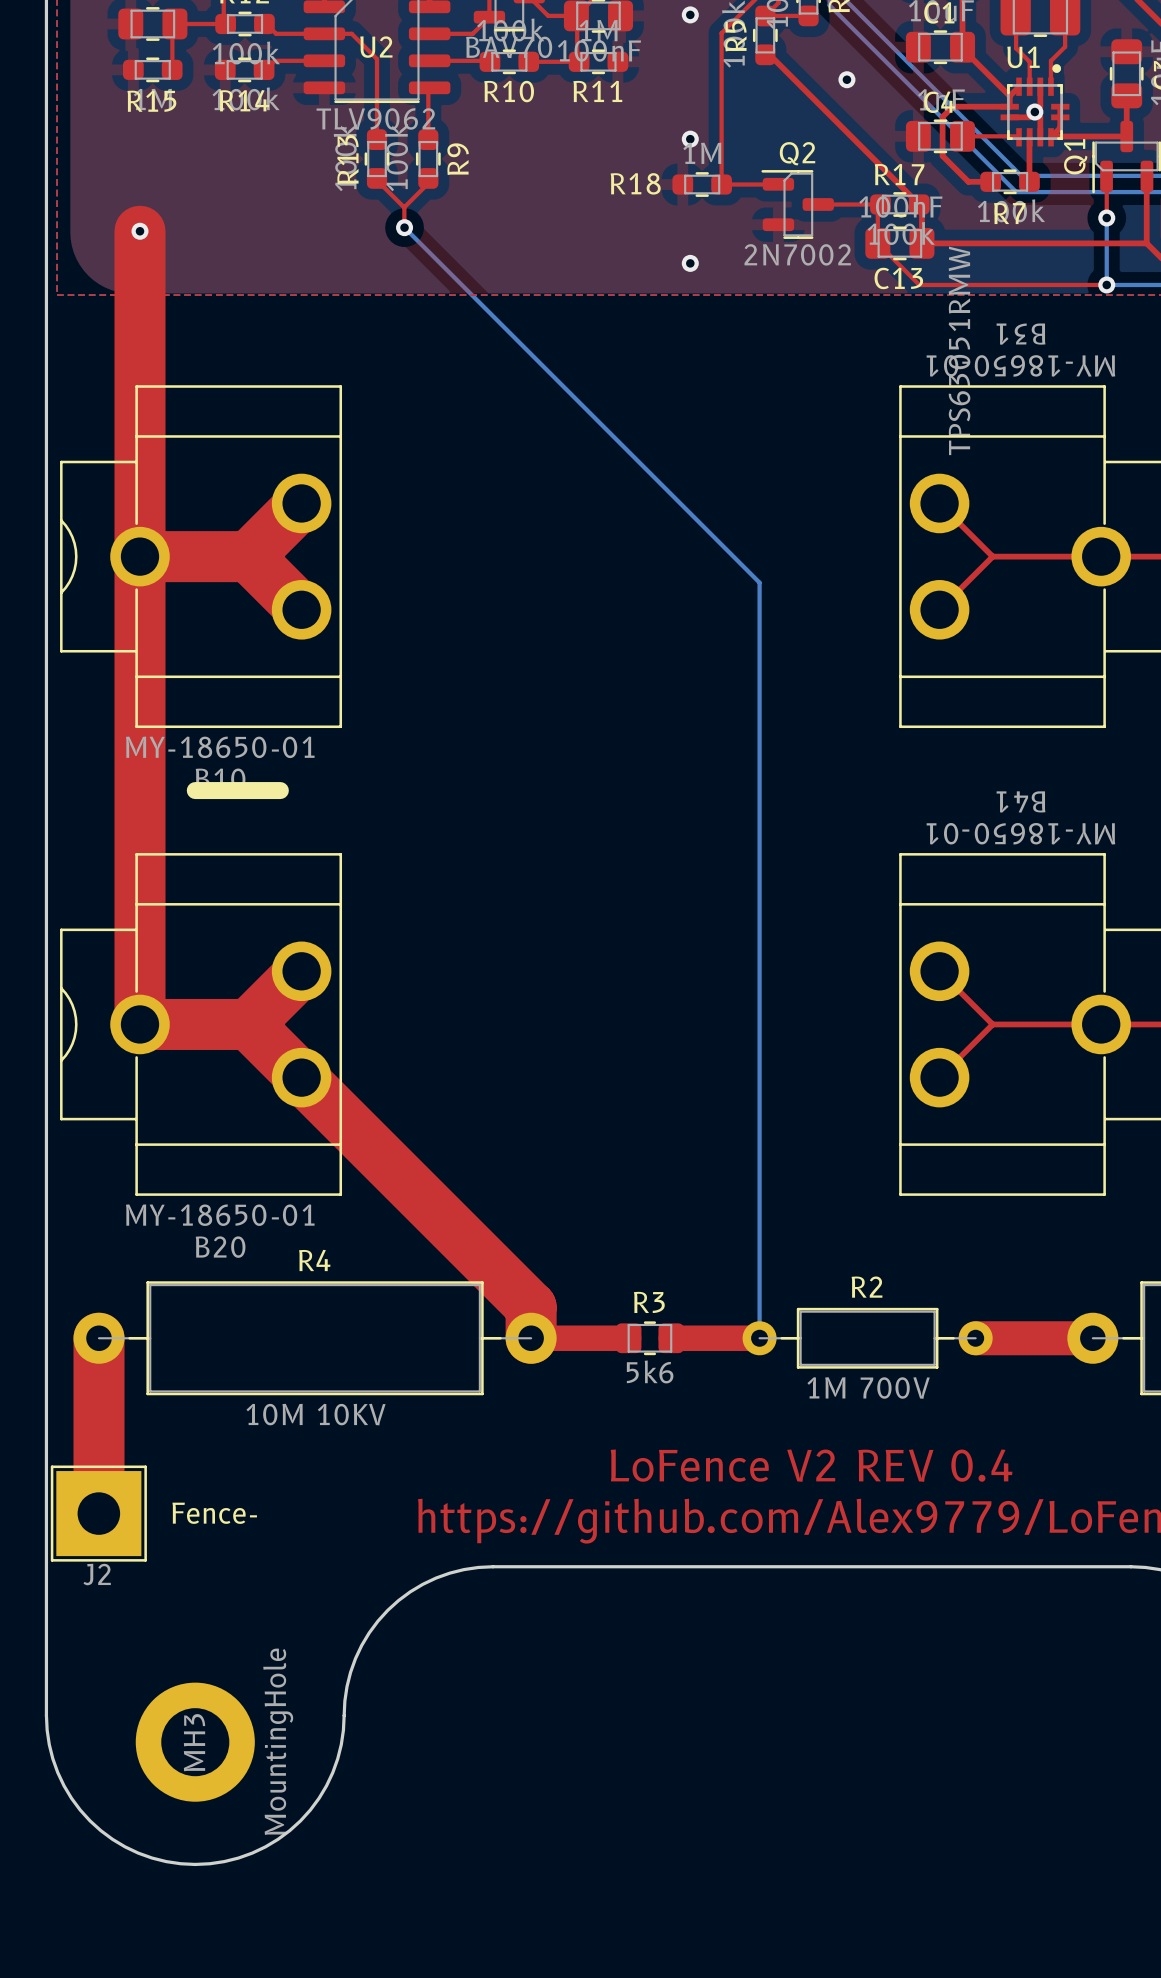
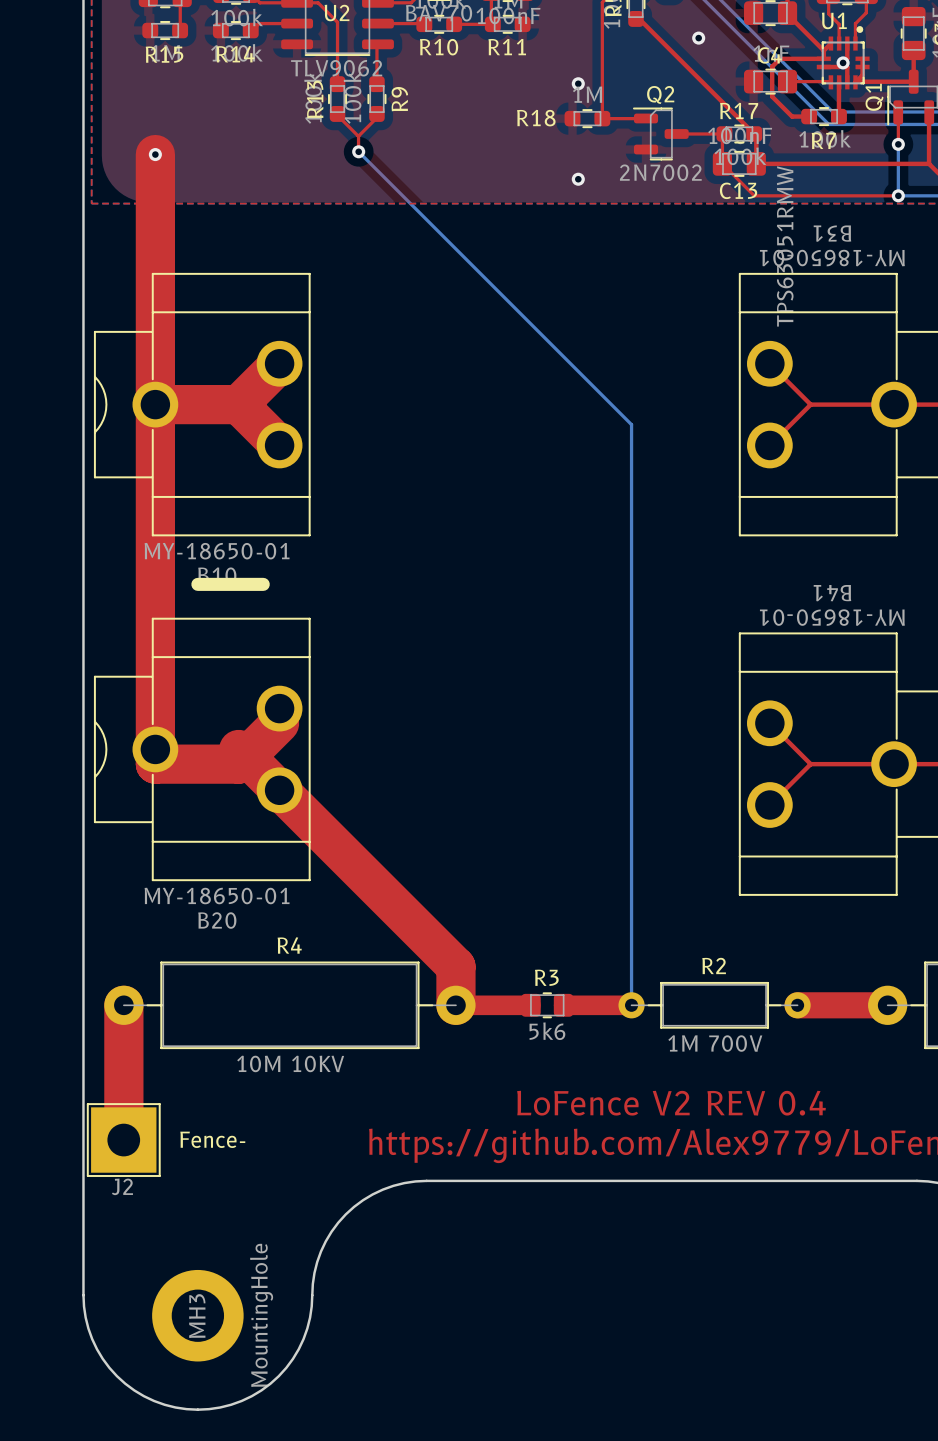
B20 position: (201, 1024) -> (202, 749)
top track: (248, 1024) (531, 1307) -> (238, 749) (455, 966) (455, 981)

